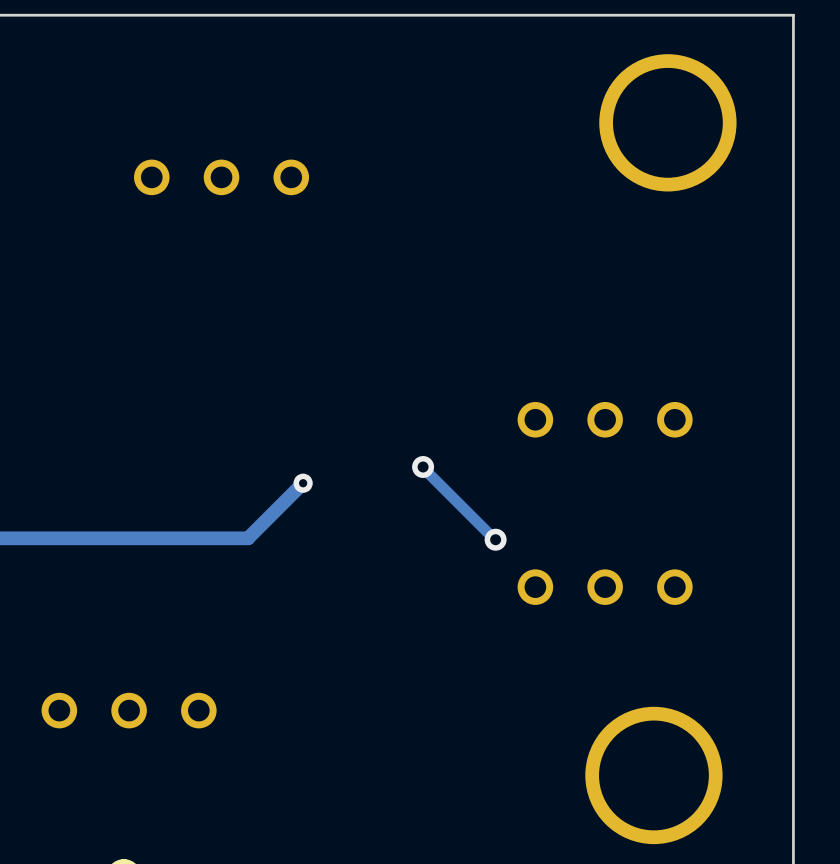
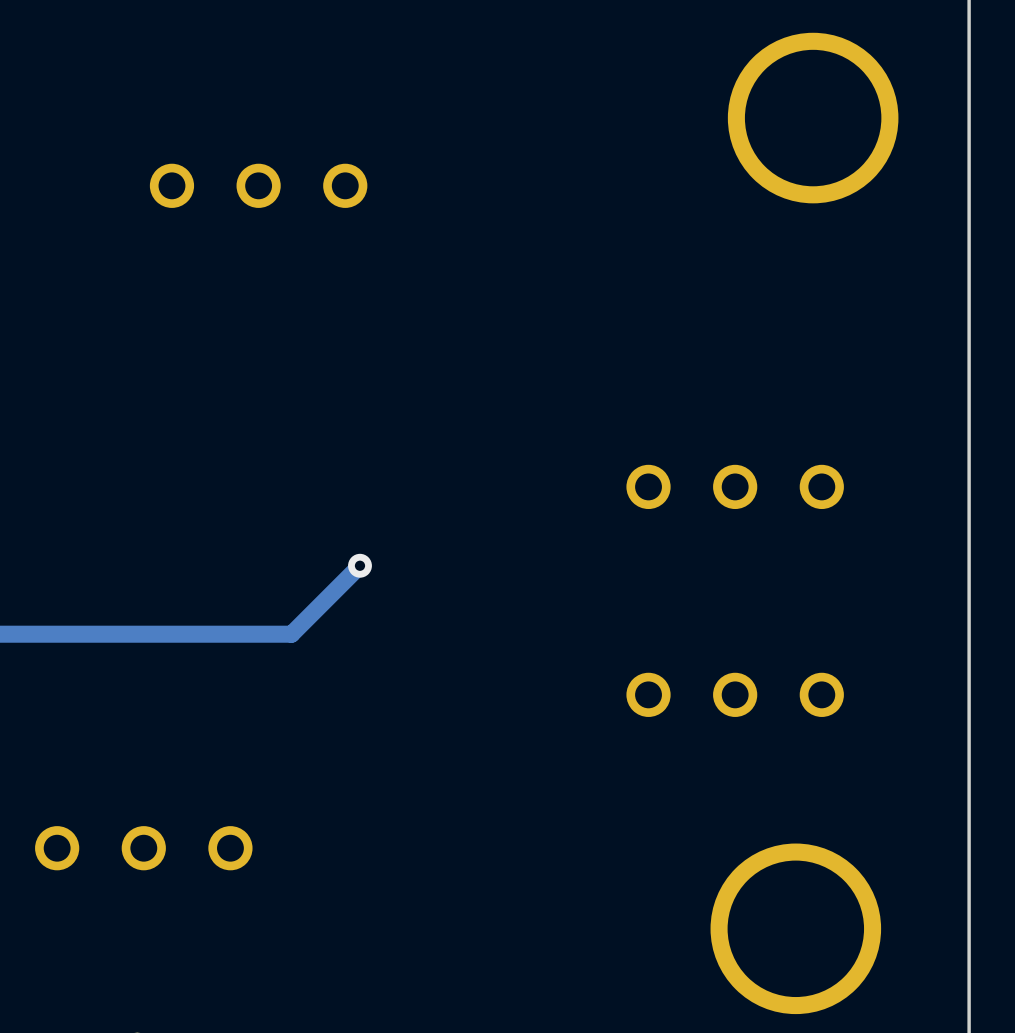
track: (423, 466) (495, 539) -> none
via: (423, 466) -> none
via: (495, 539) -> none

